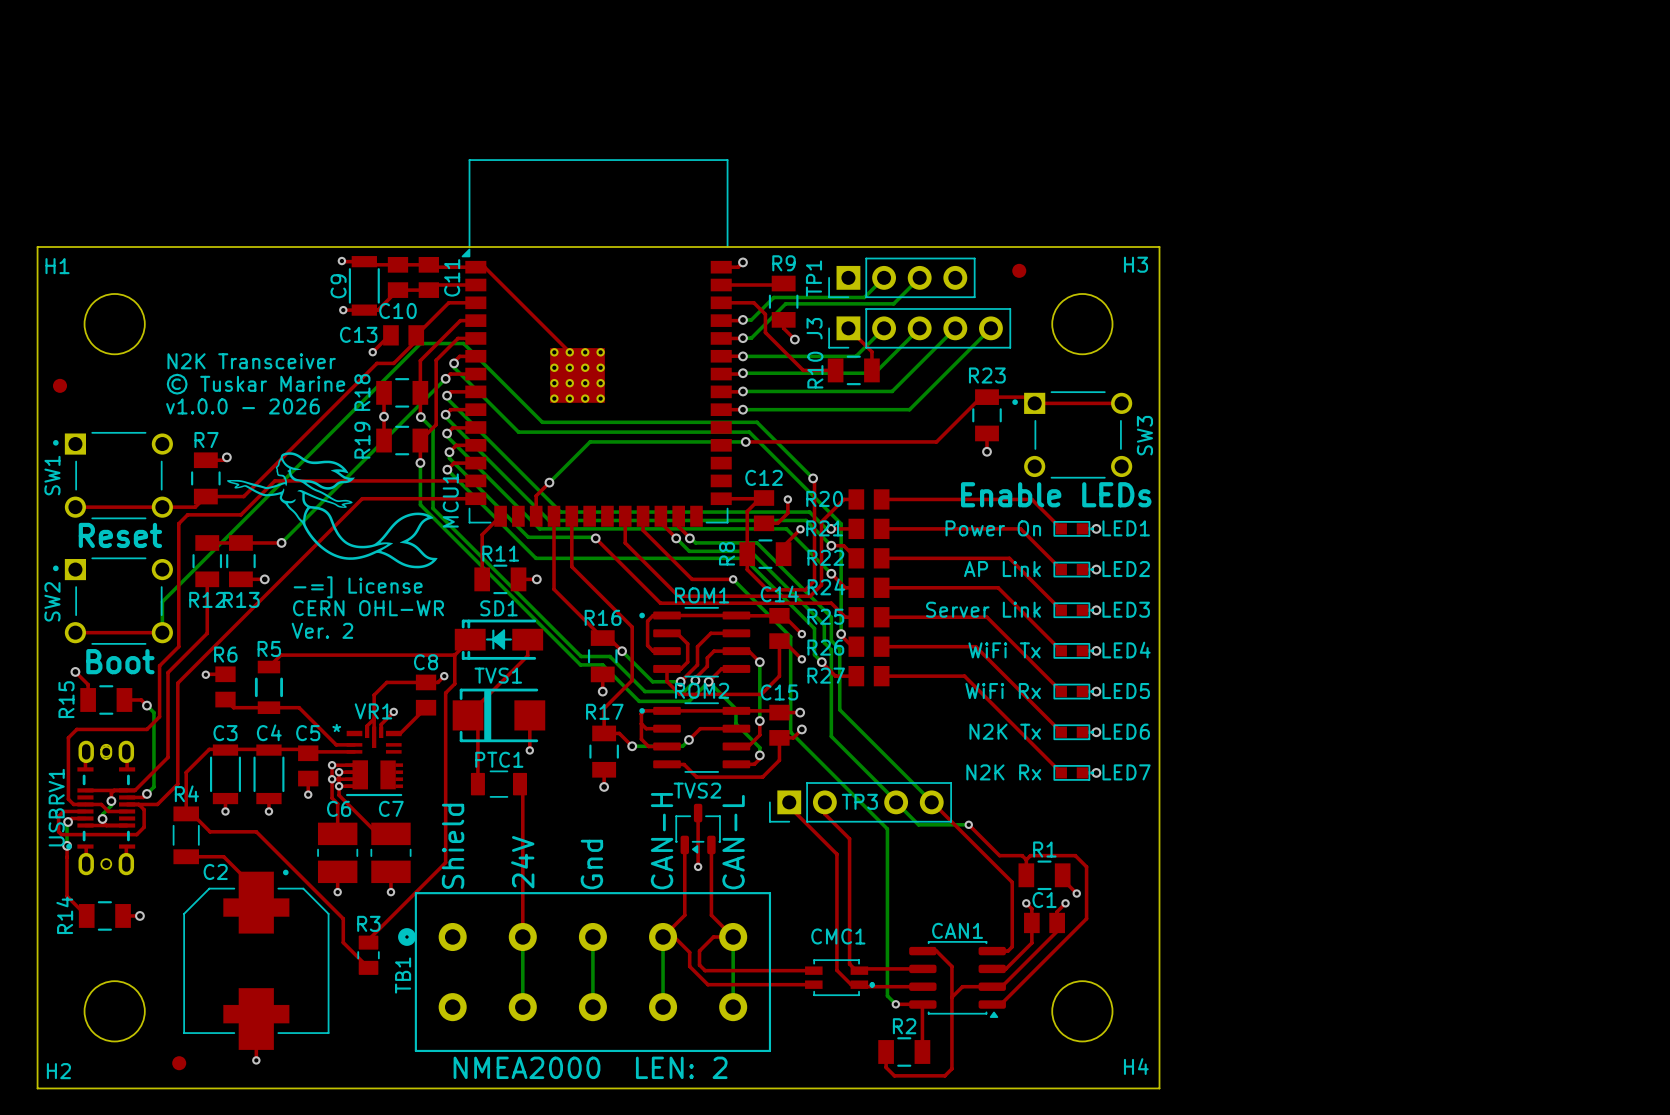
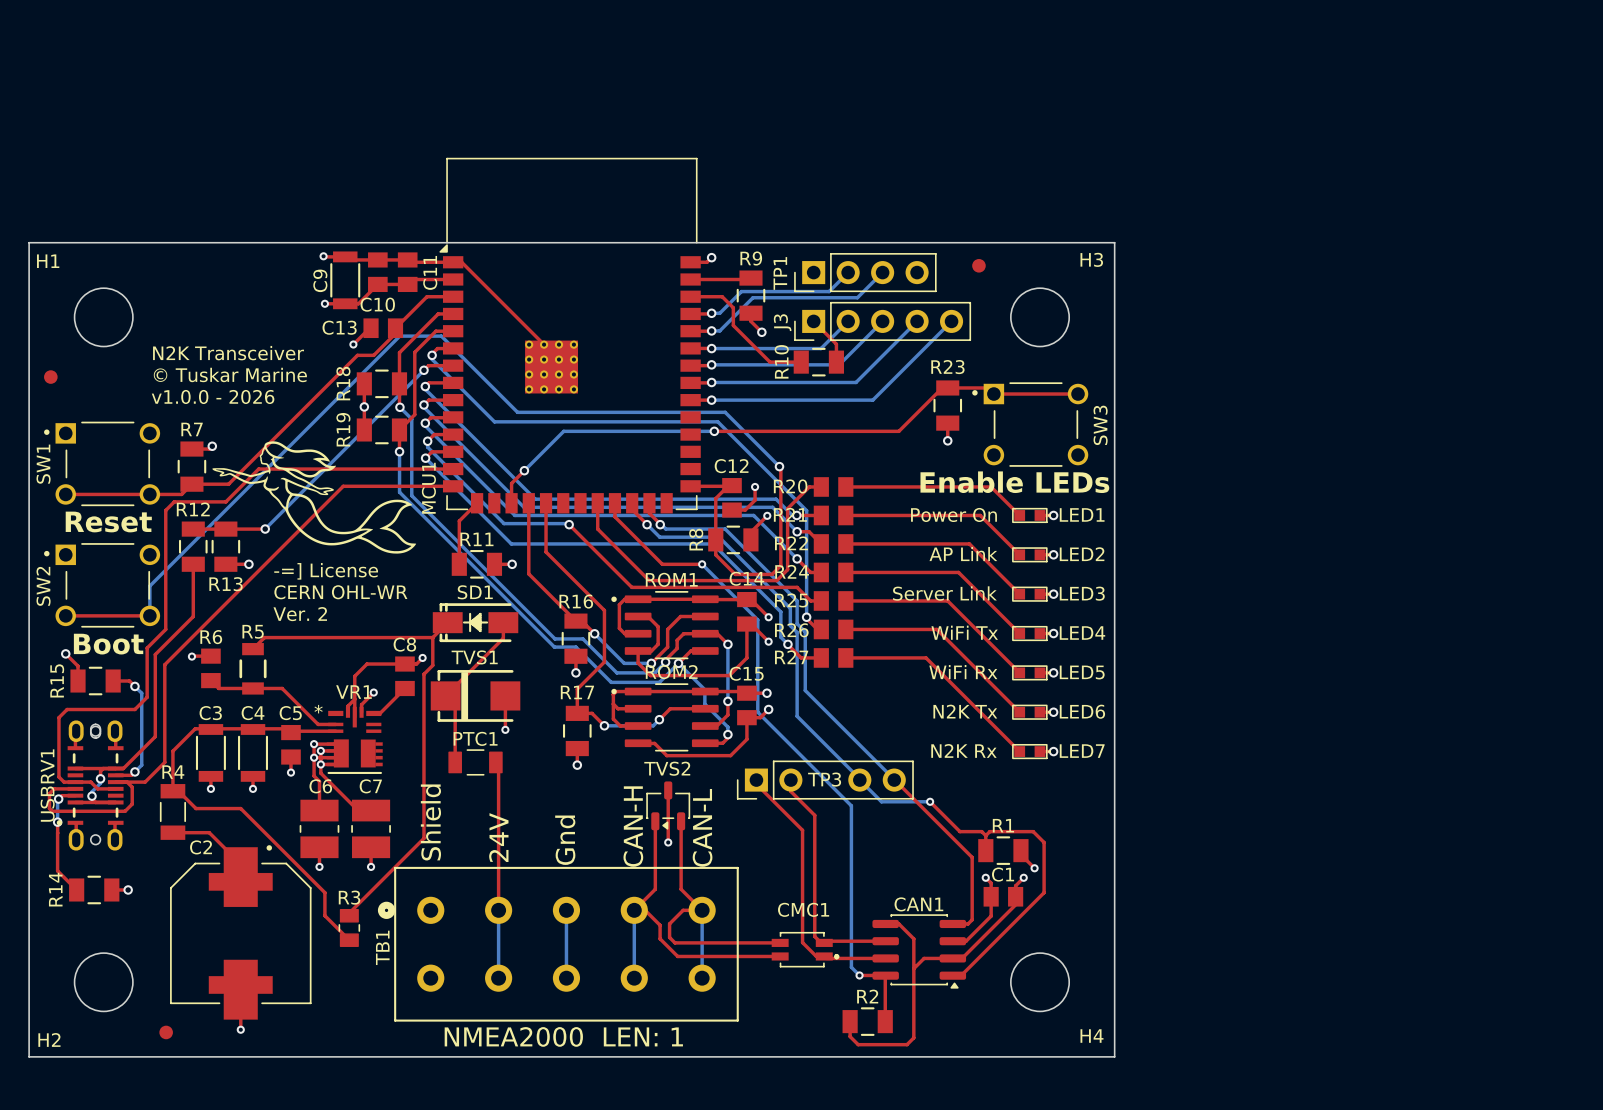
R12 name position: R12 (207, 599) -> R12 (193, 509)
text: NMEA2000 LEN: 2 (590, 1067) -> NMEA2000 LEN: 1 (563, 1036)

